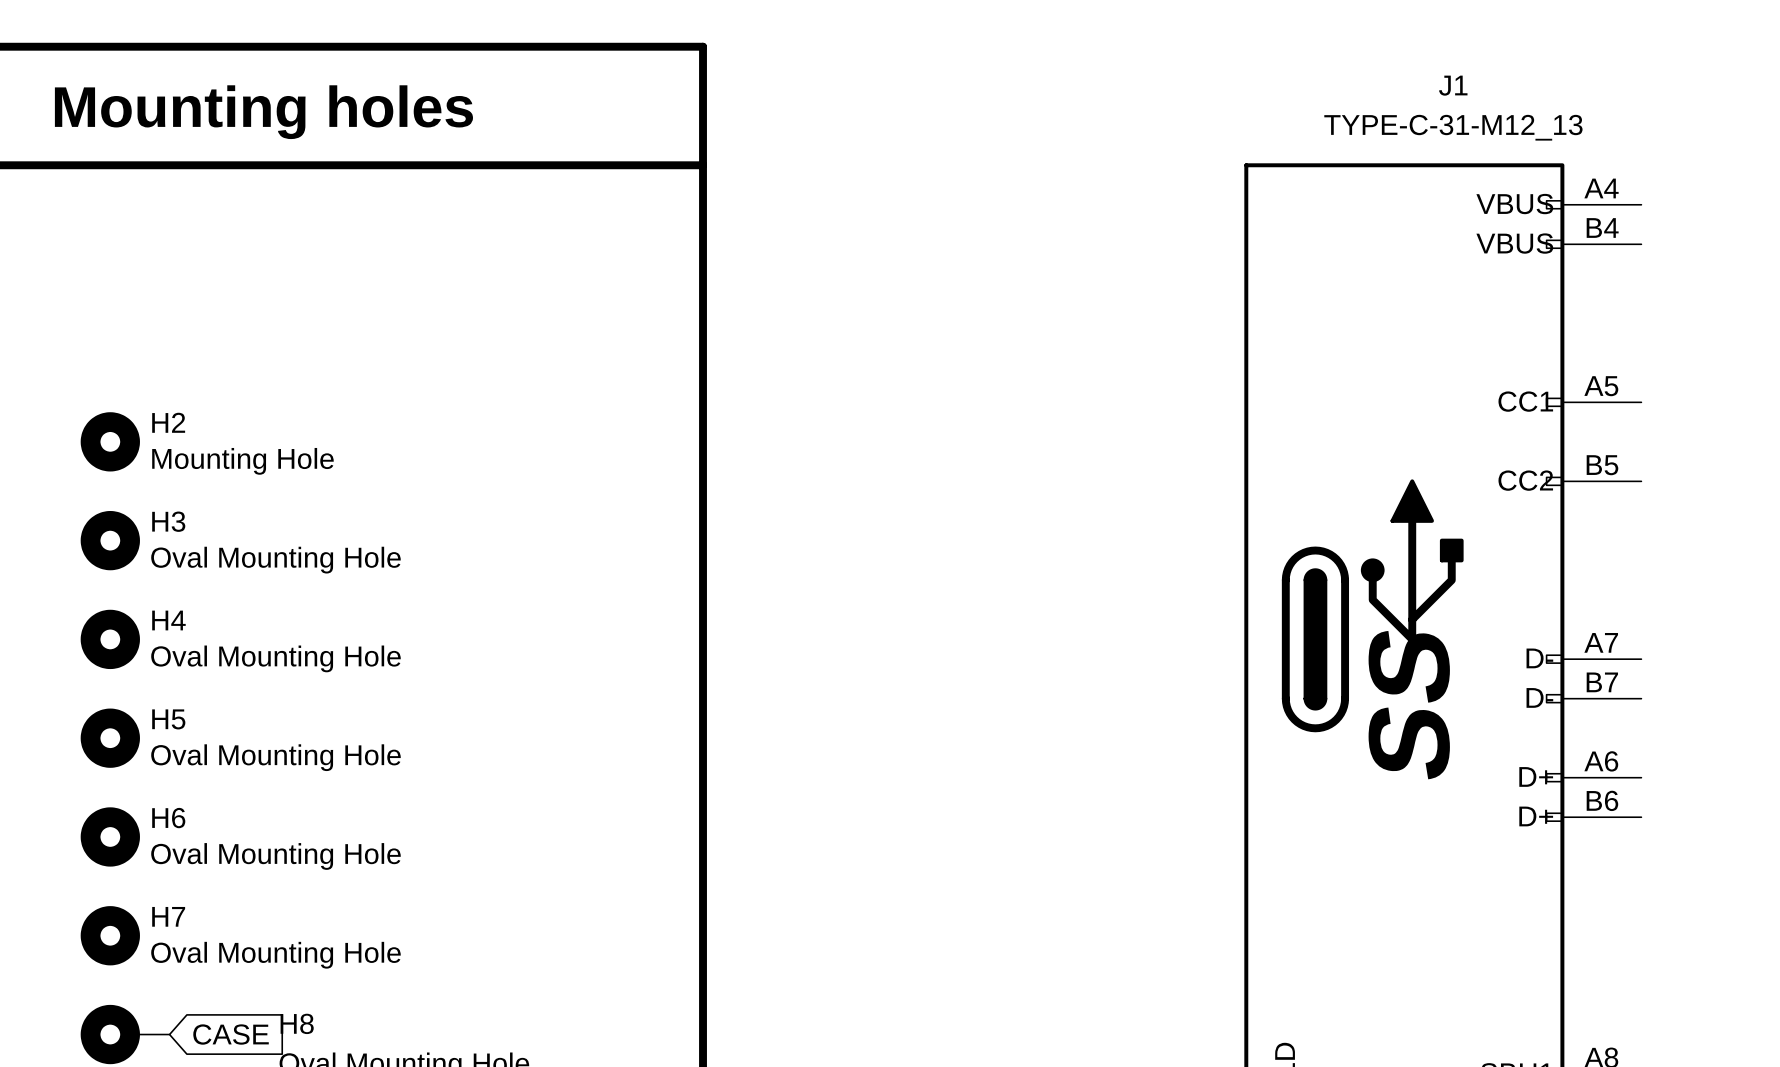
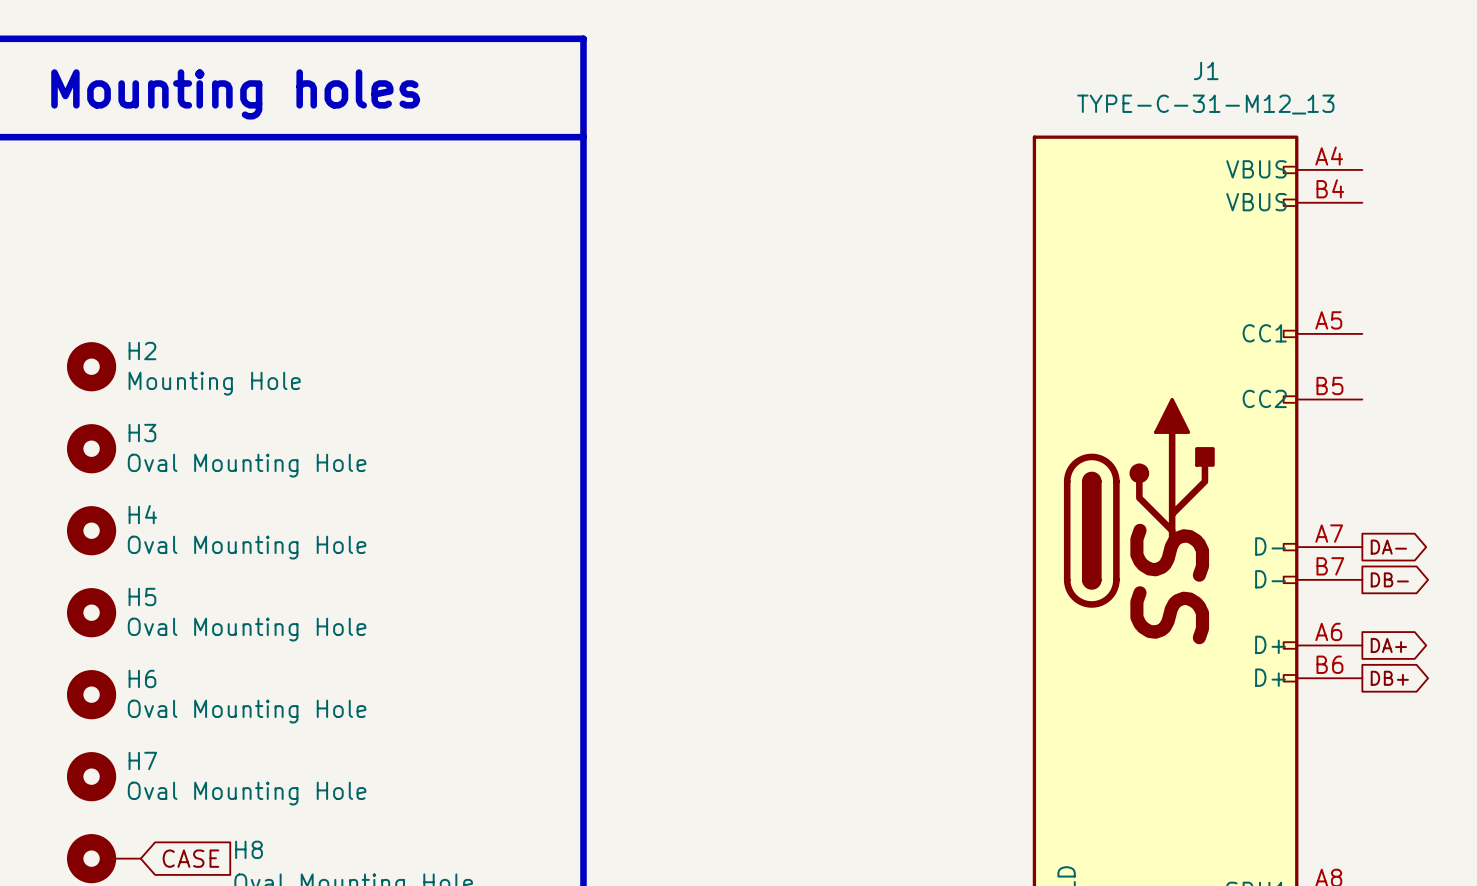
global label: none -> DA- (1388, 547)
global label: none -> DB- (1389, 579)
global label: none -> DA+ (1388, 645)
global label: none -> DB+ (1389, 678)

